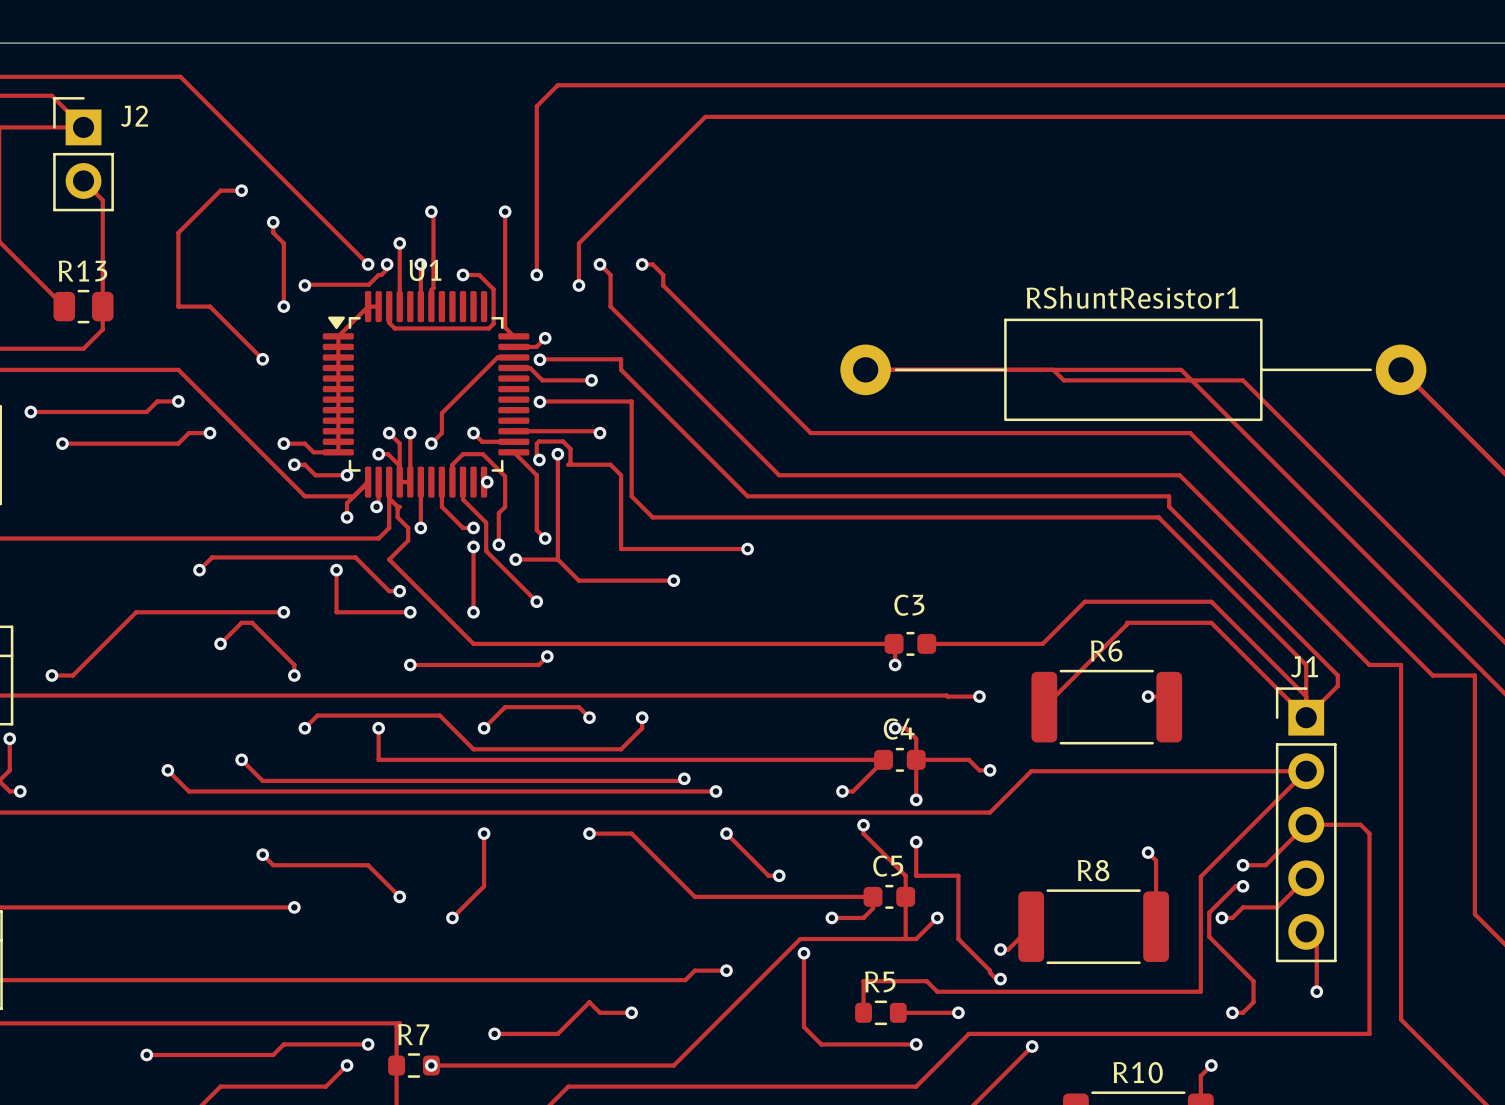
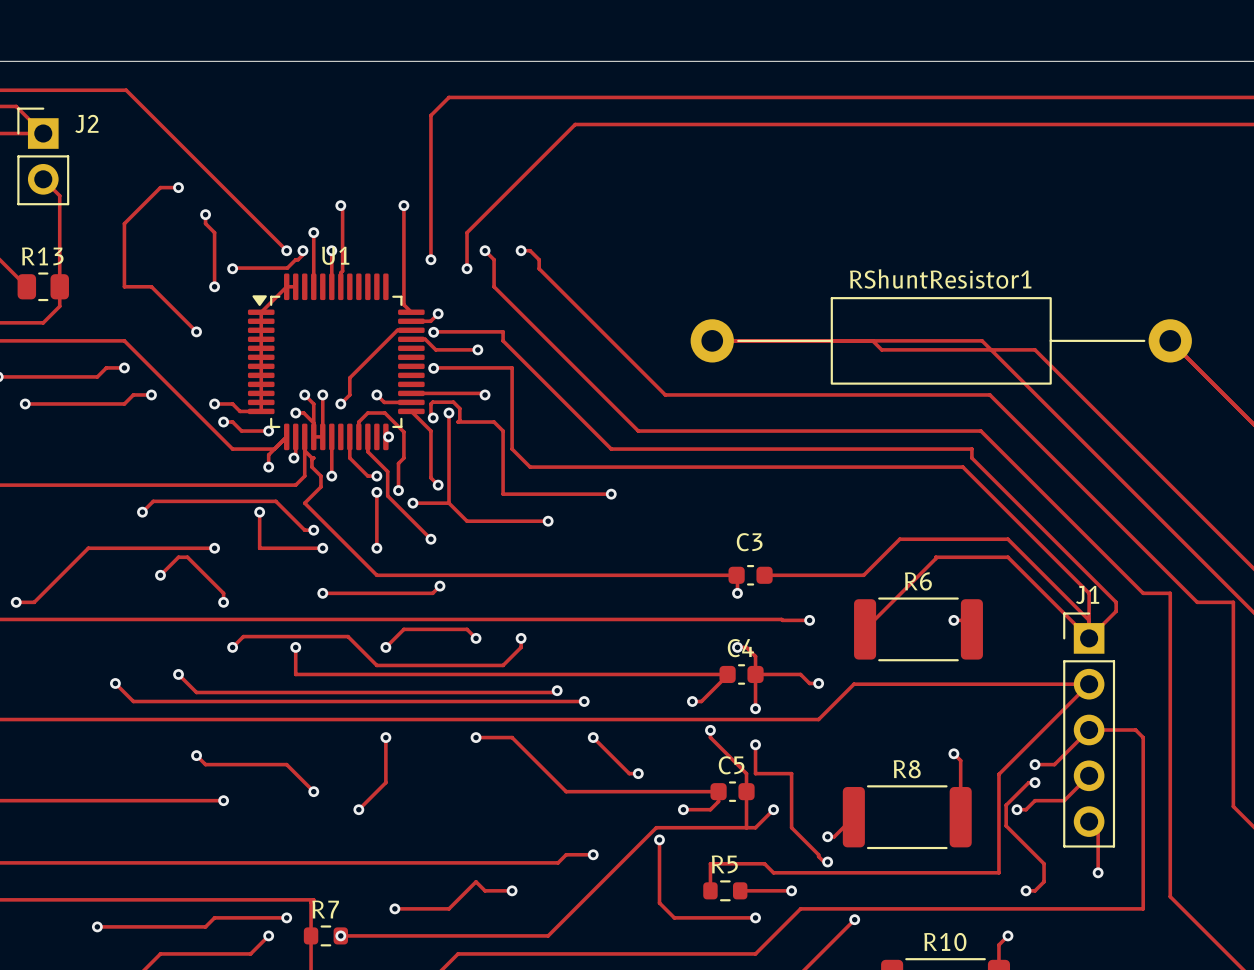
track: (462, 274) (479, 274) (493, 289) (493, 323) (488, 328) (394, 328) (389, 322) (389, 306) -> none
via: (462, 274) -> none

